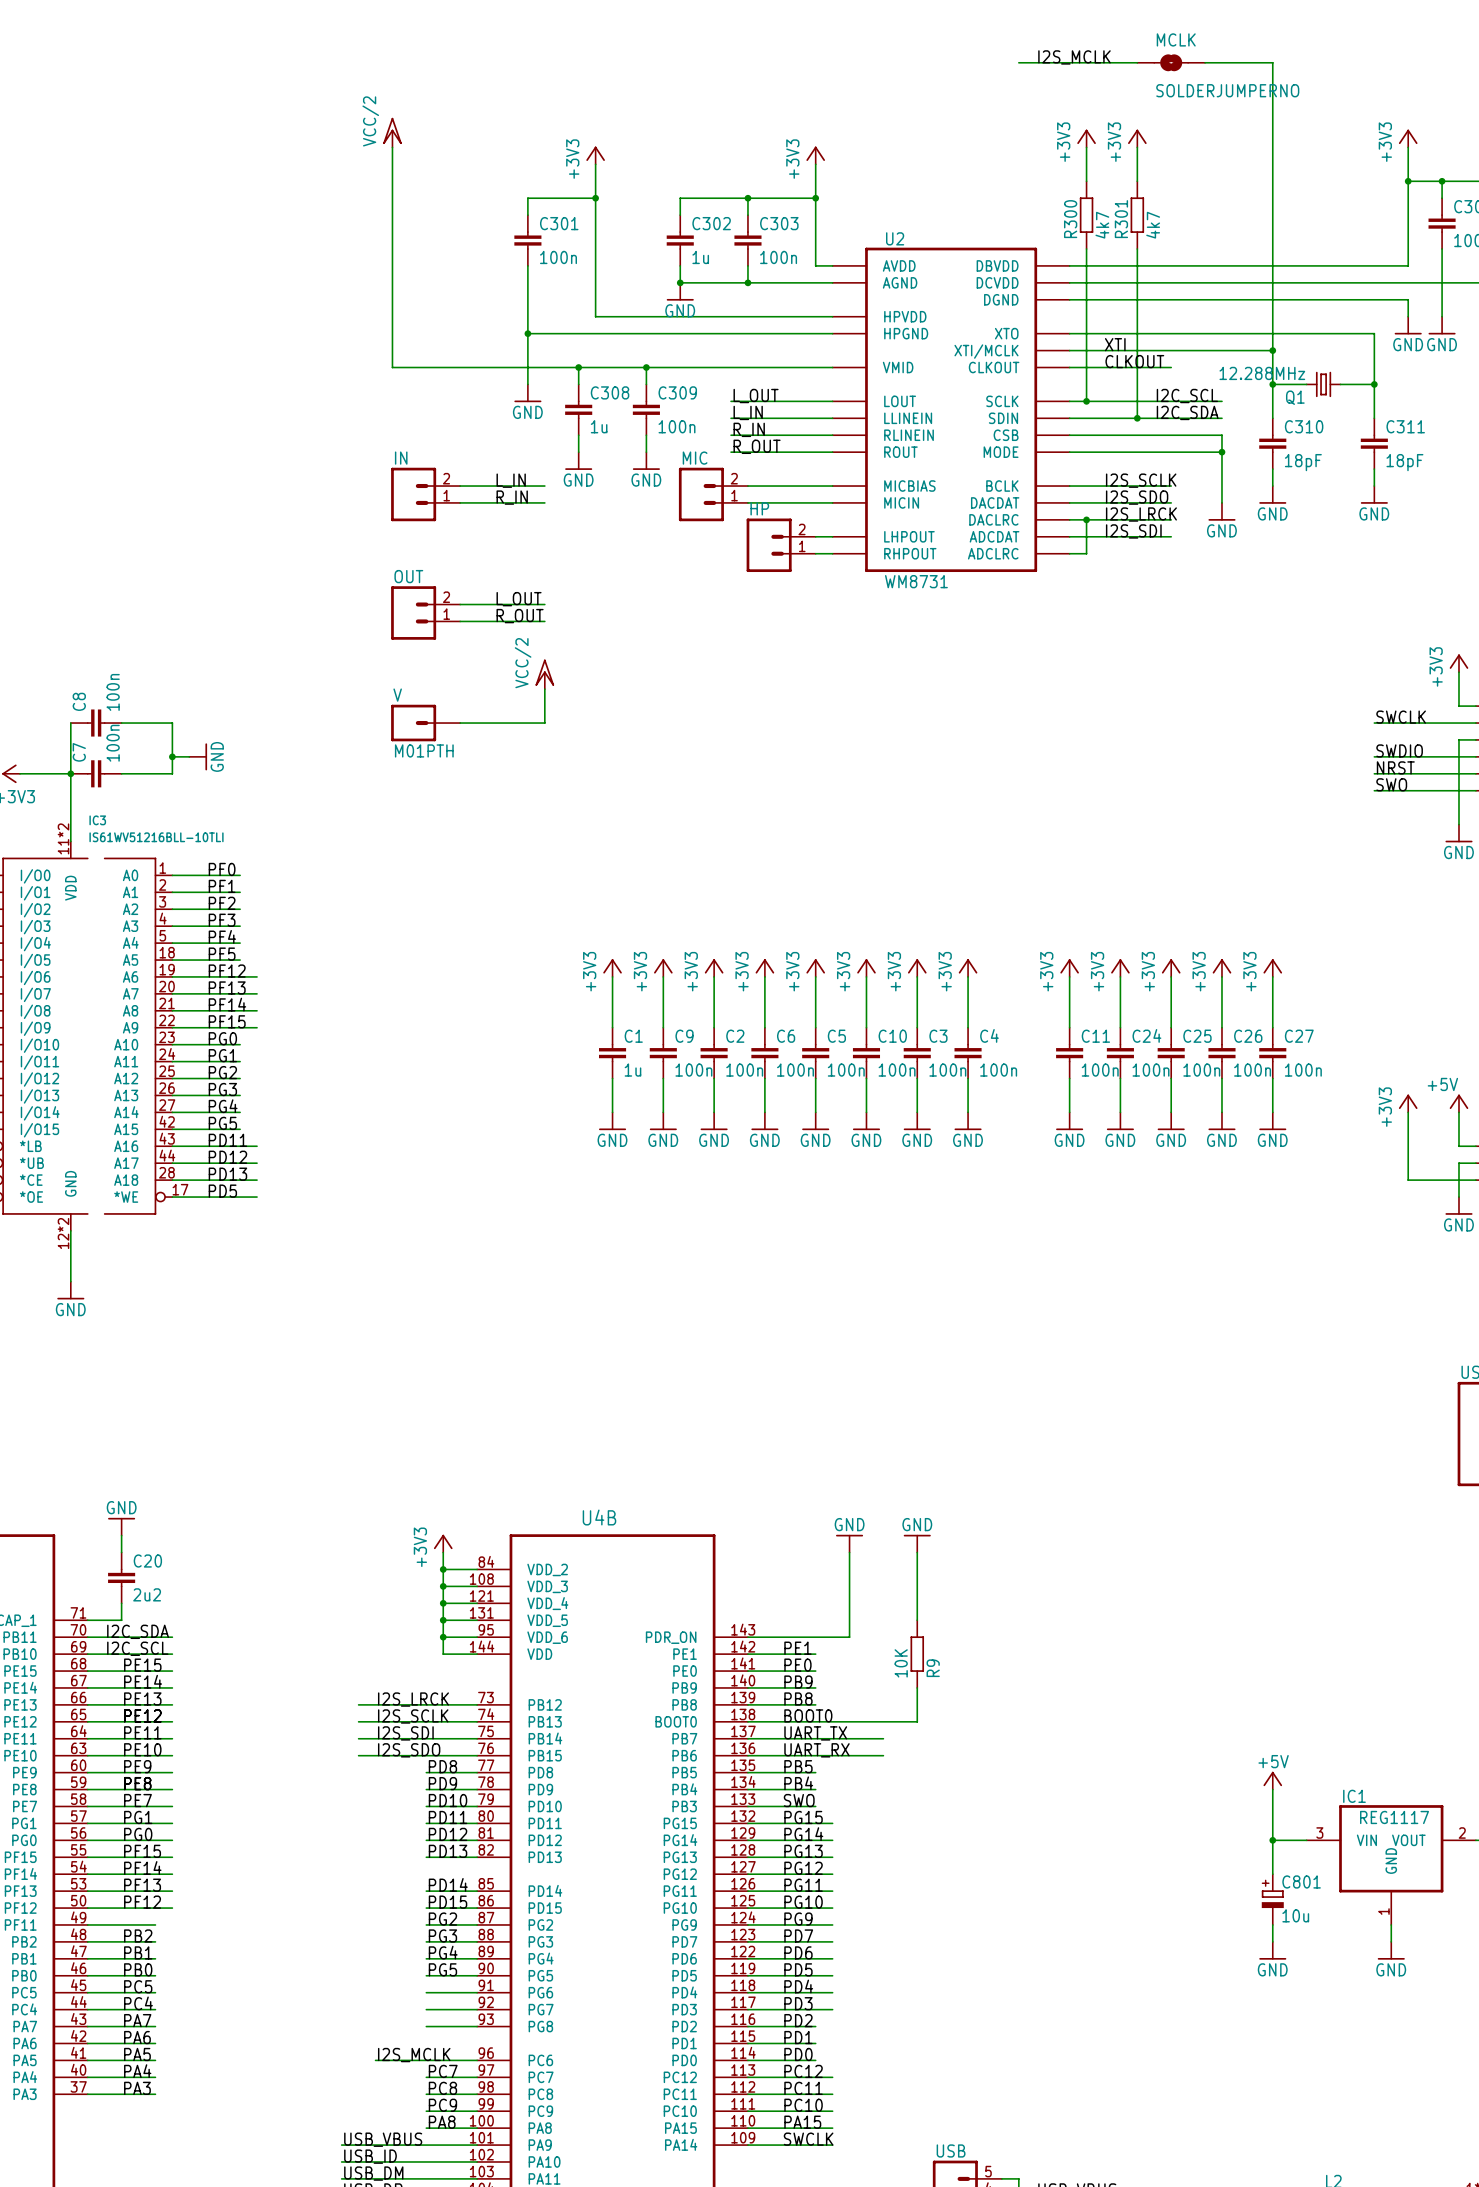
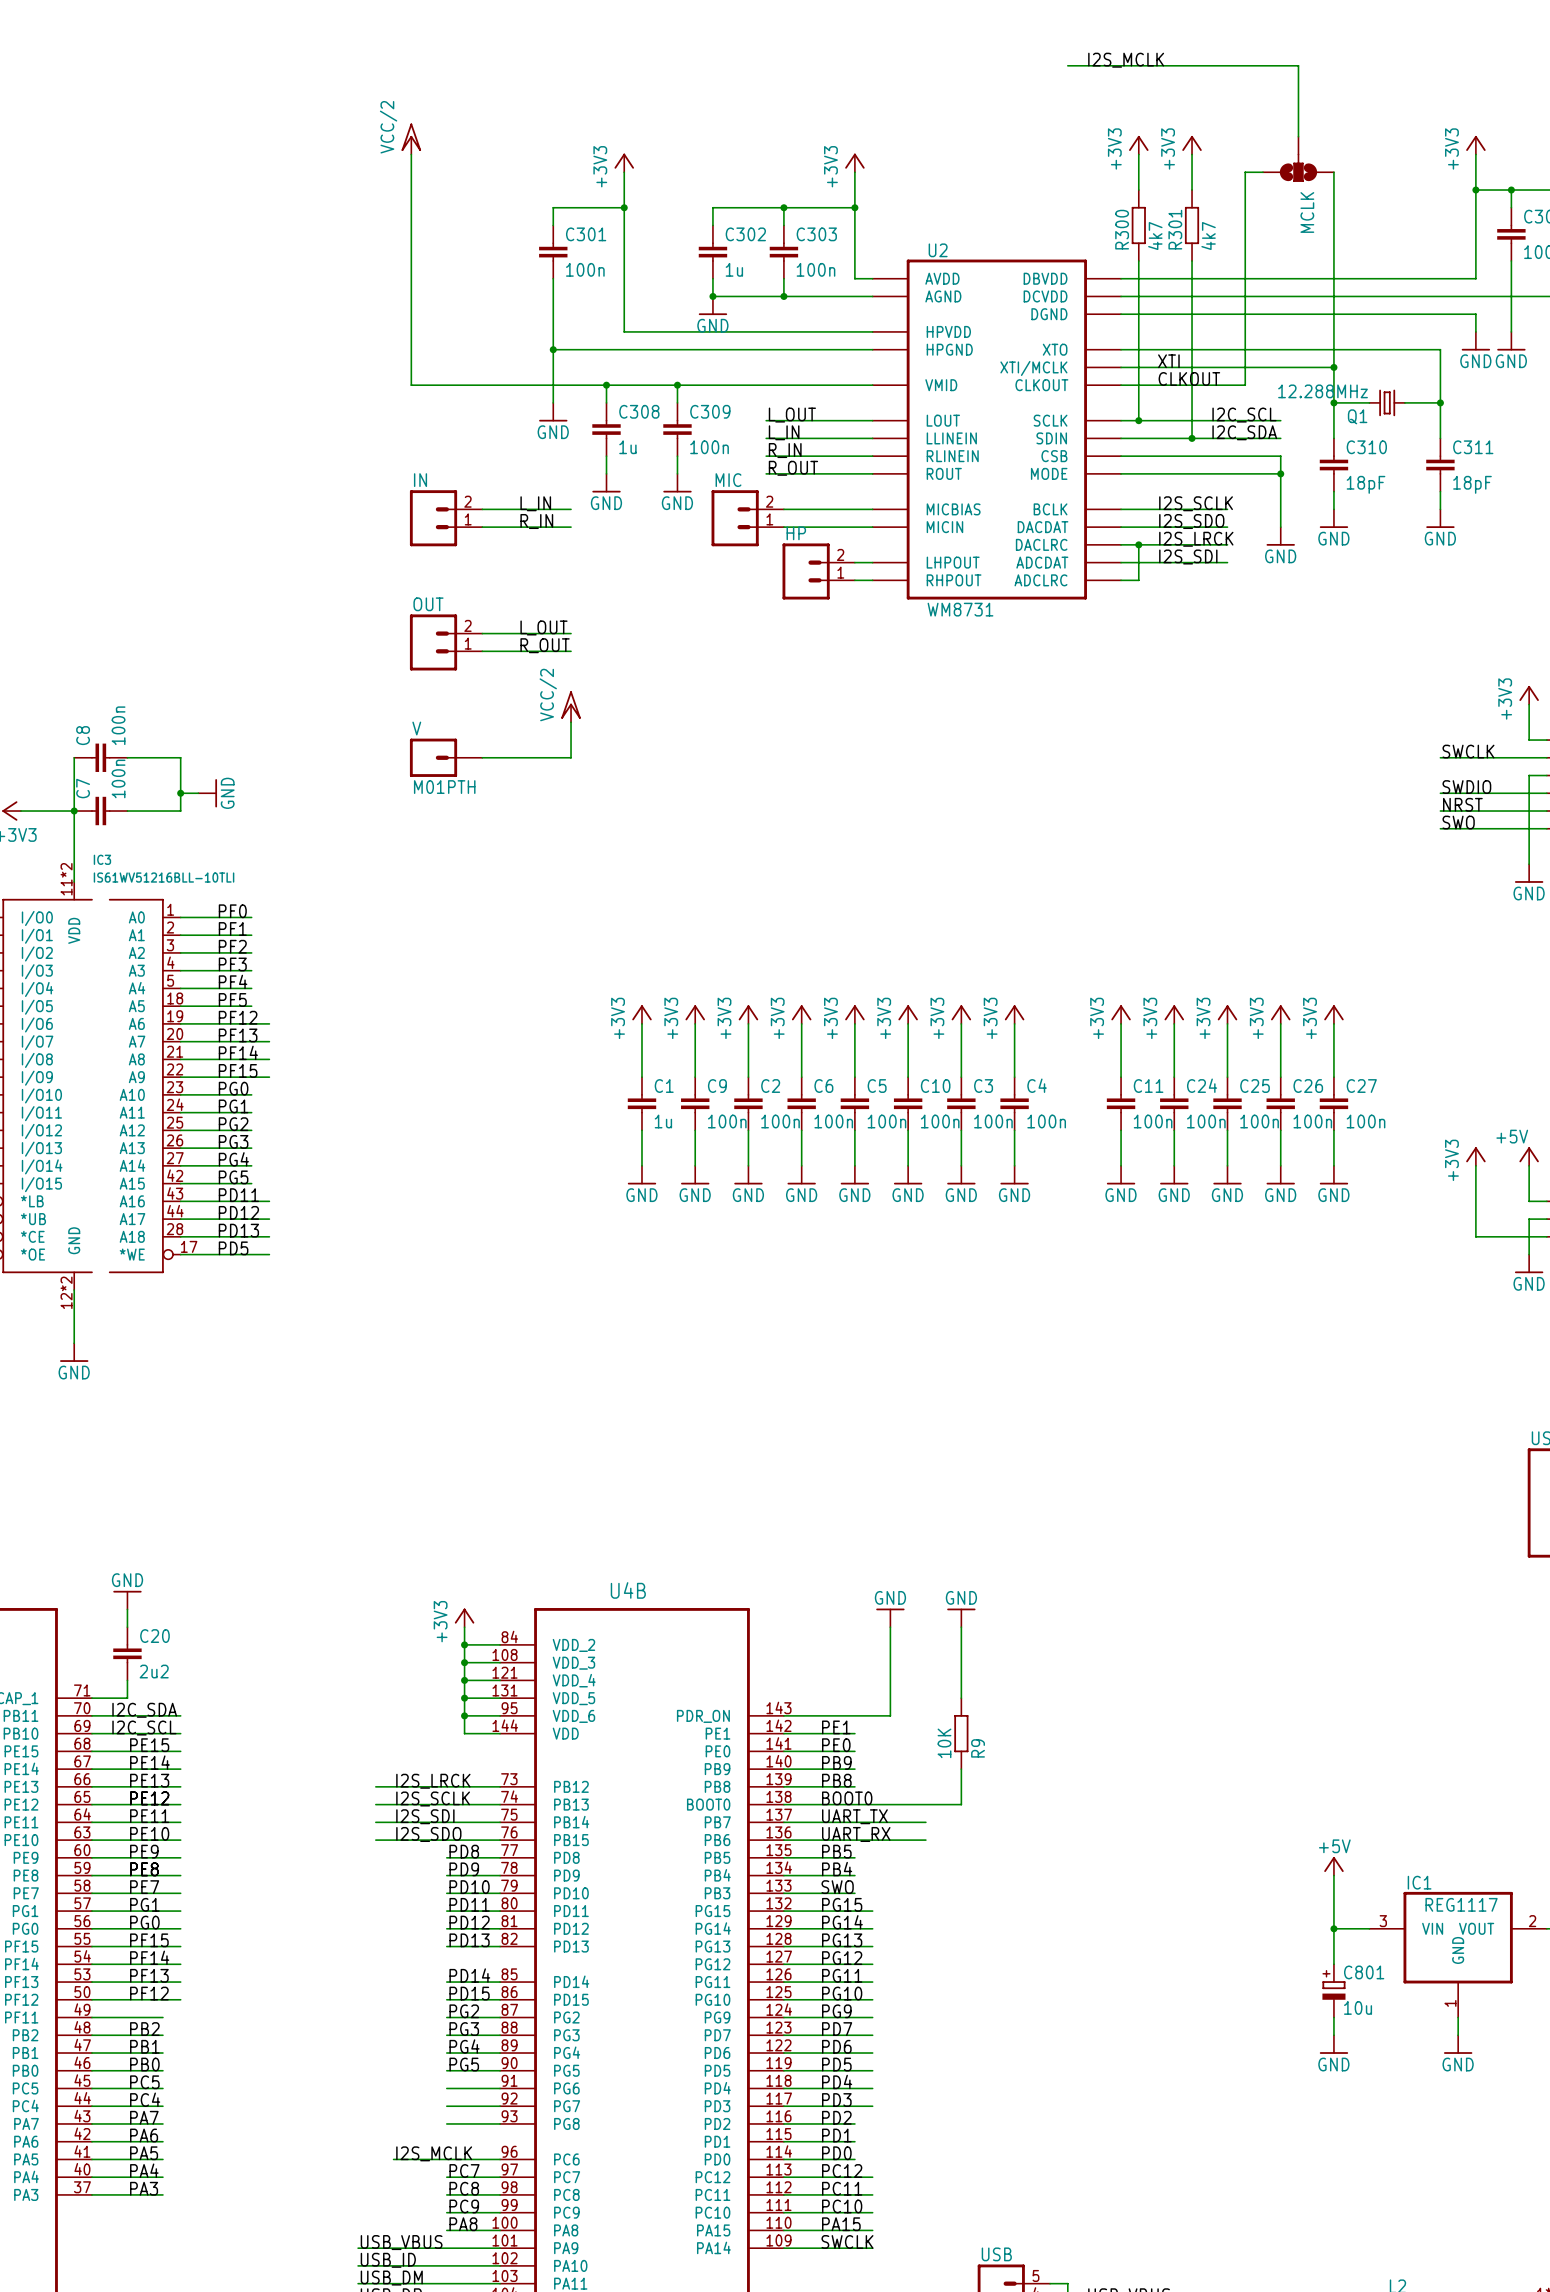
MCLK: SOLDERJUMPERNO (1171, 62) -> none
wire: (1238, 62) (1272, 62) (1272, 164) -> (1298, 65) (1298, 136)
MCLK: none -> (1298, 159)
wire: none -> (1262, 172) (1245, 172) (1245, 385) (1227, 385)

